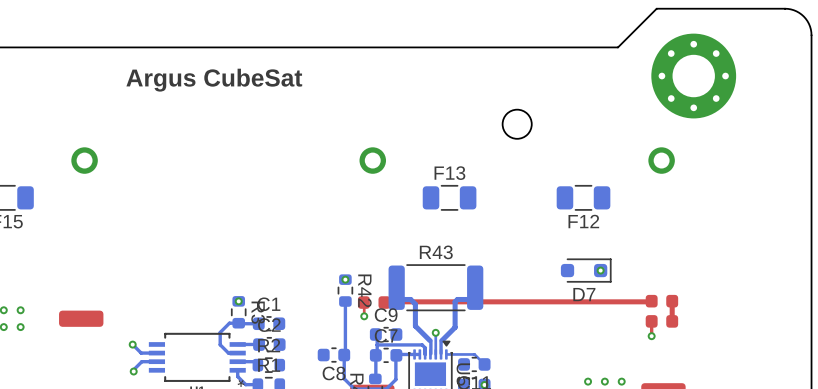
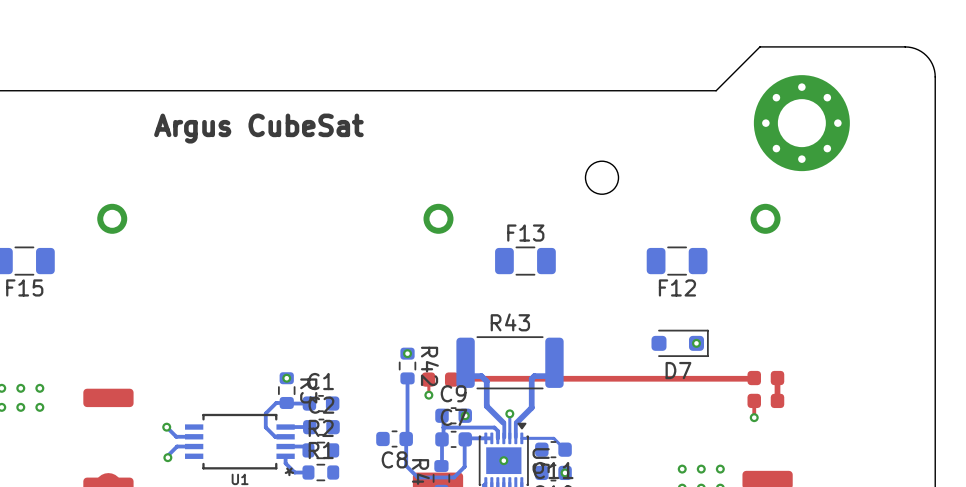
via: none -> (465, 415)
via: none -> (503, 460)

